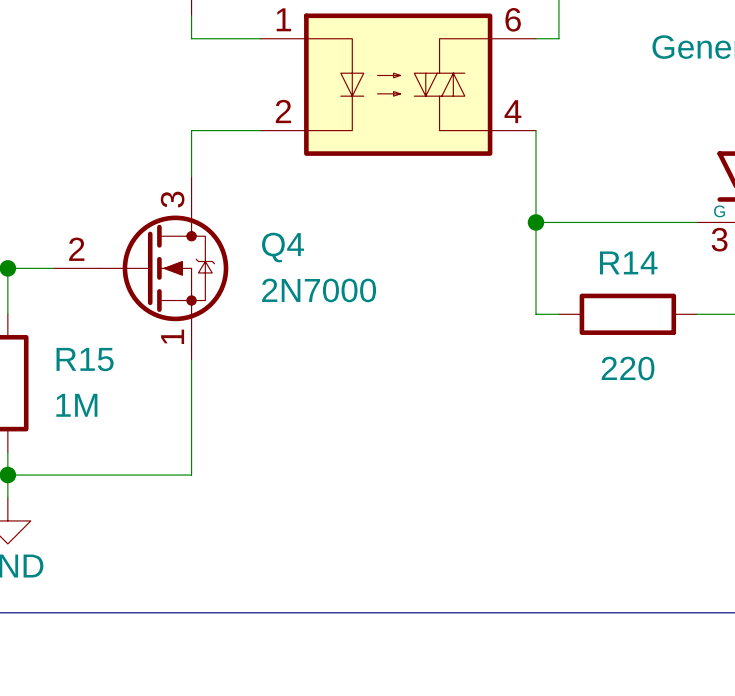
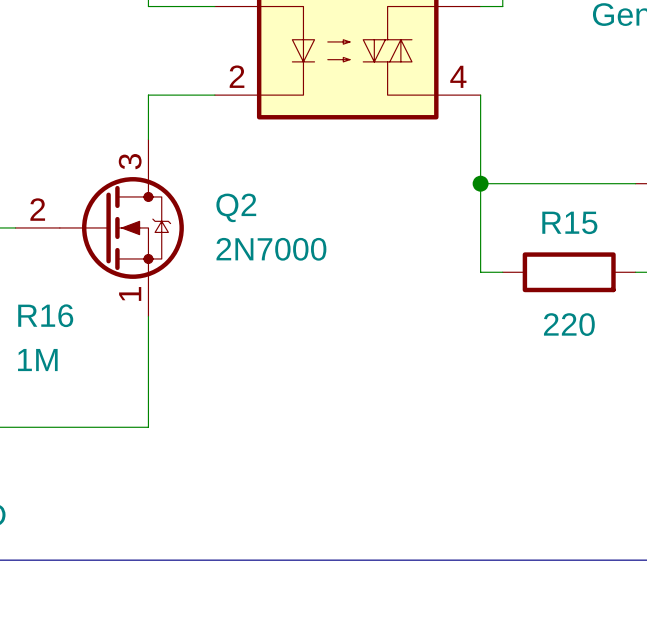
Q4 name: Q4 (283, 247) -> Q2 (236, 207)
R14 name: R14 (628, 262) -> R15 (569, 222)
R15 name: R15 (85, 359) -> R16 (45, 315)

